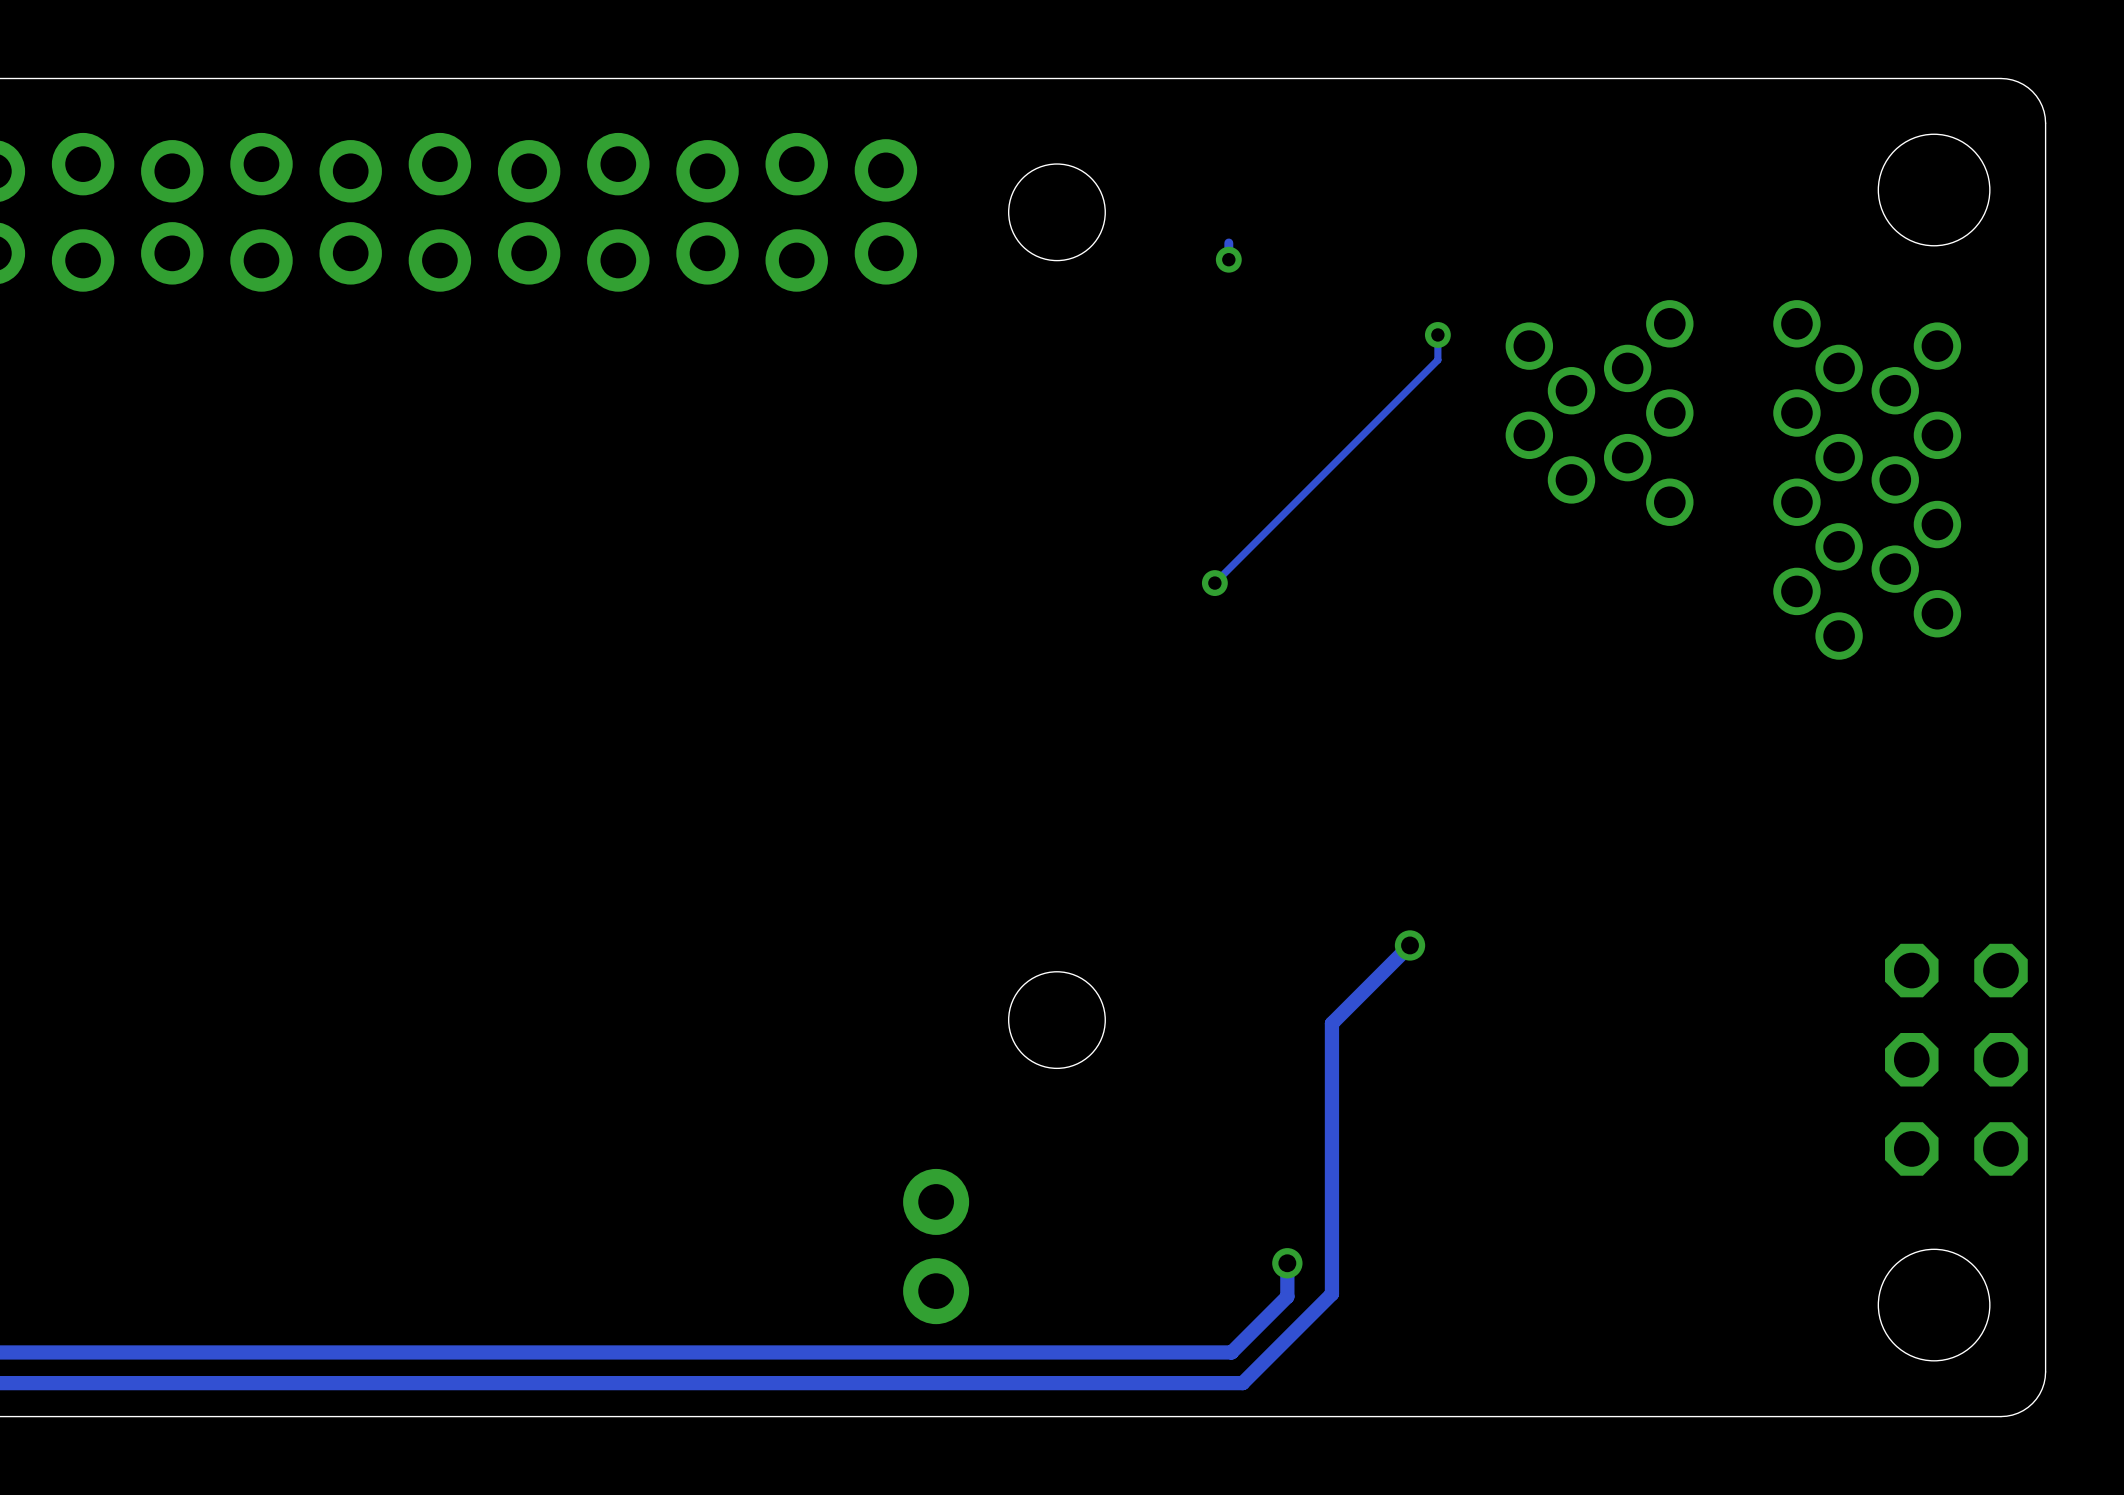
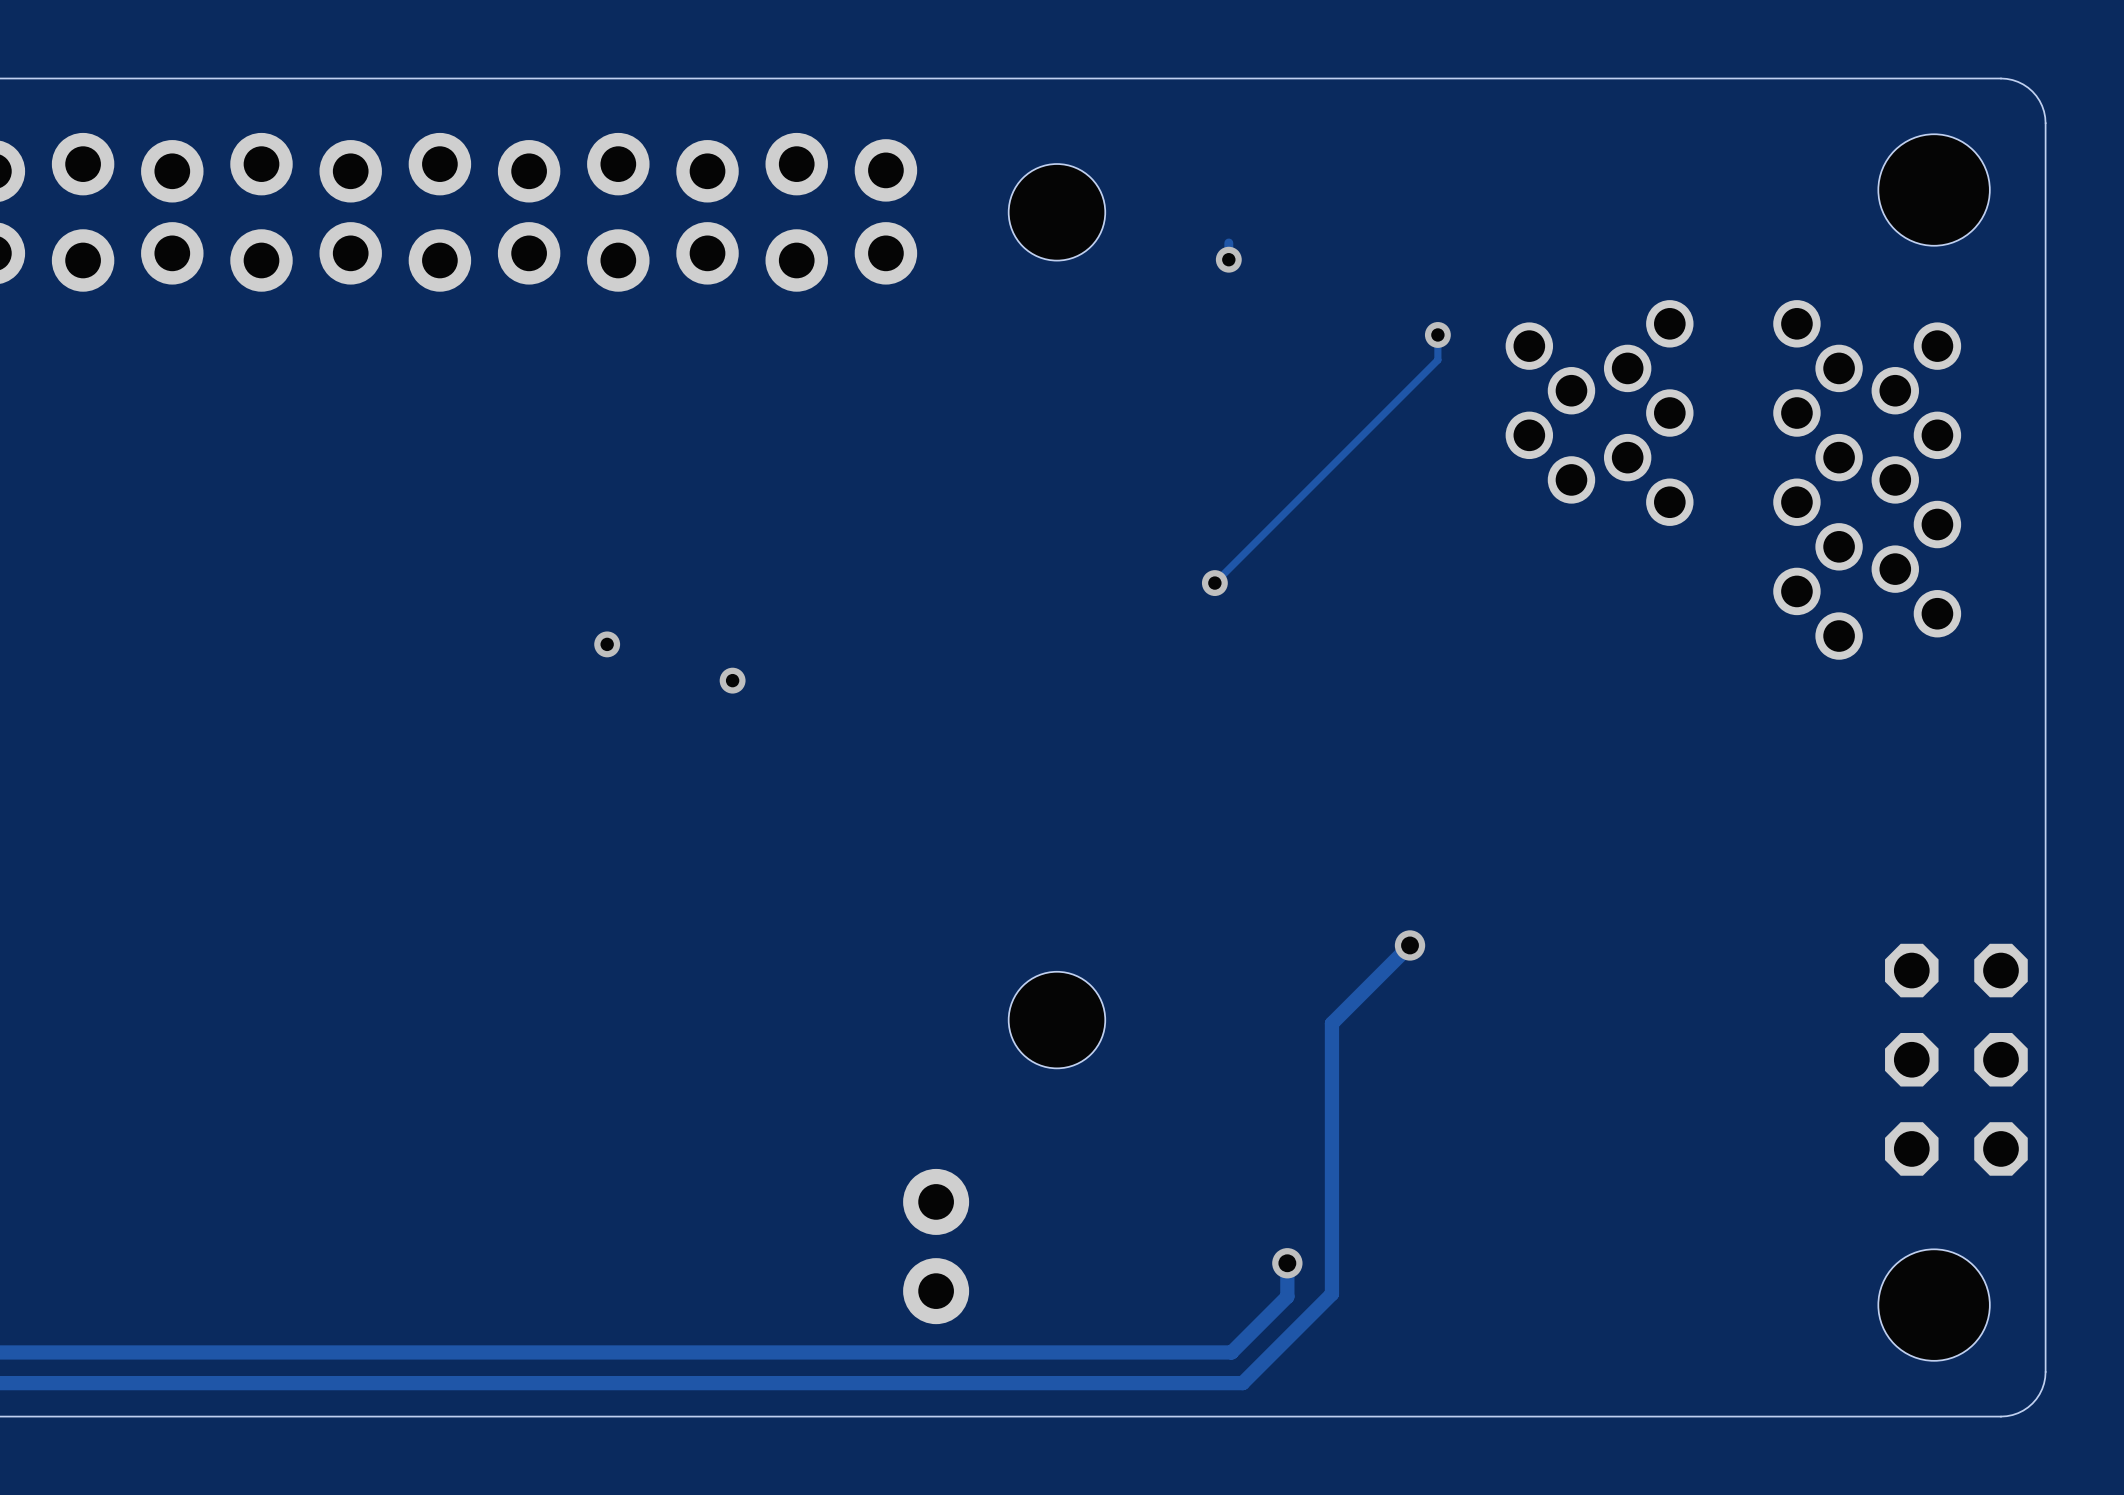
via: none -> (607, 644)
via: none -> (732, 680)

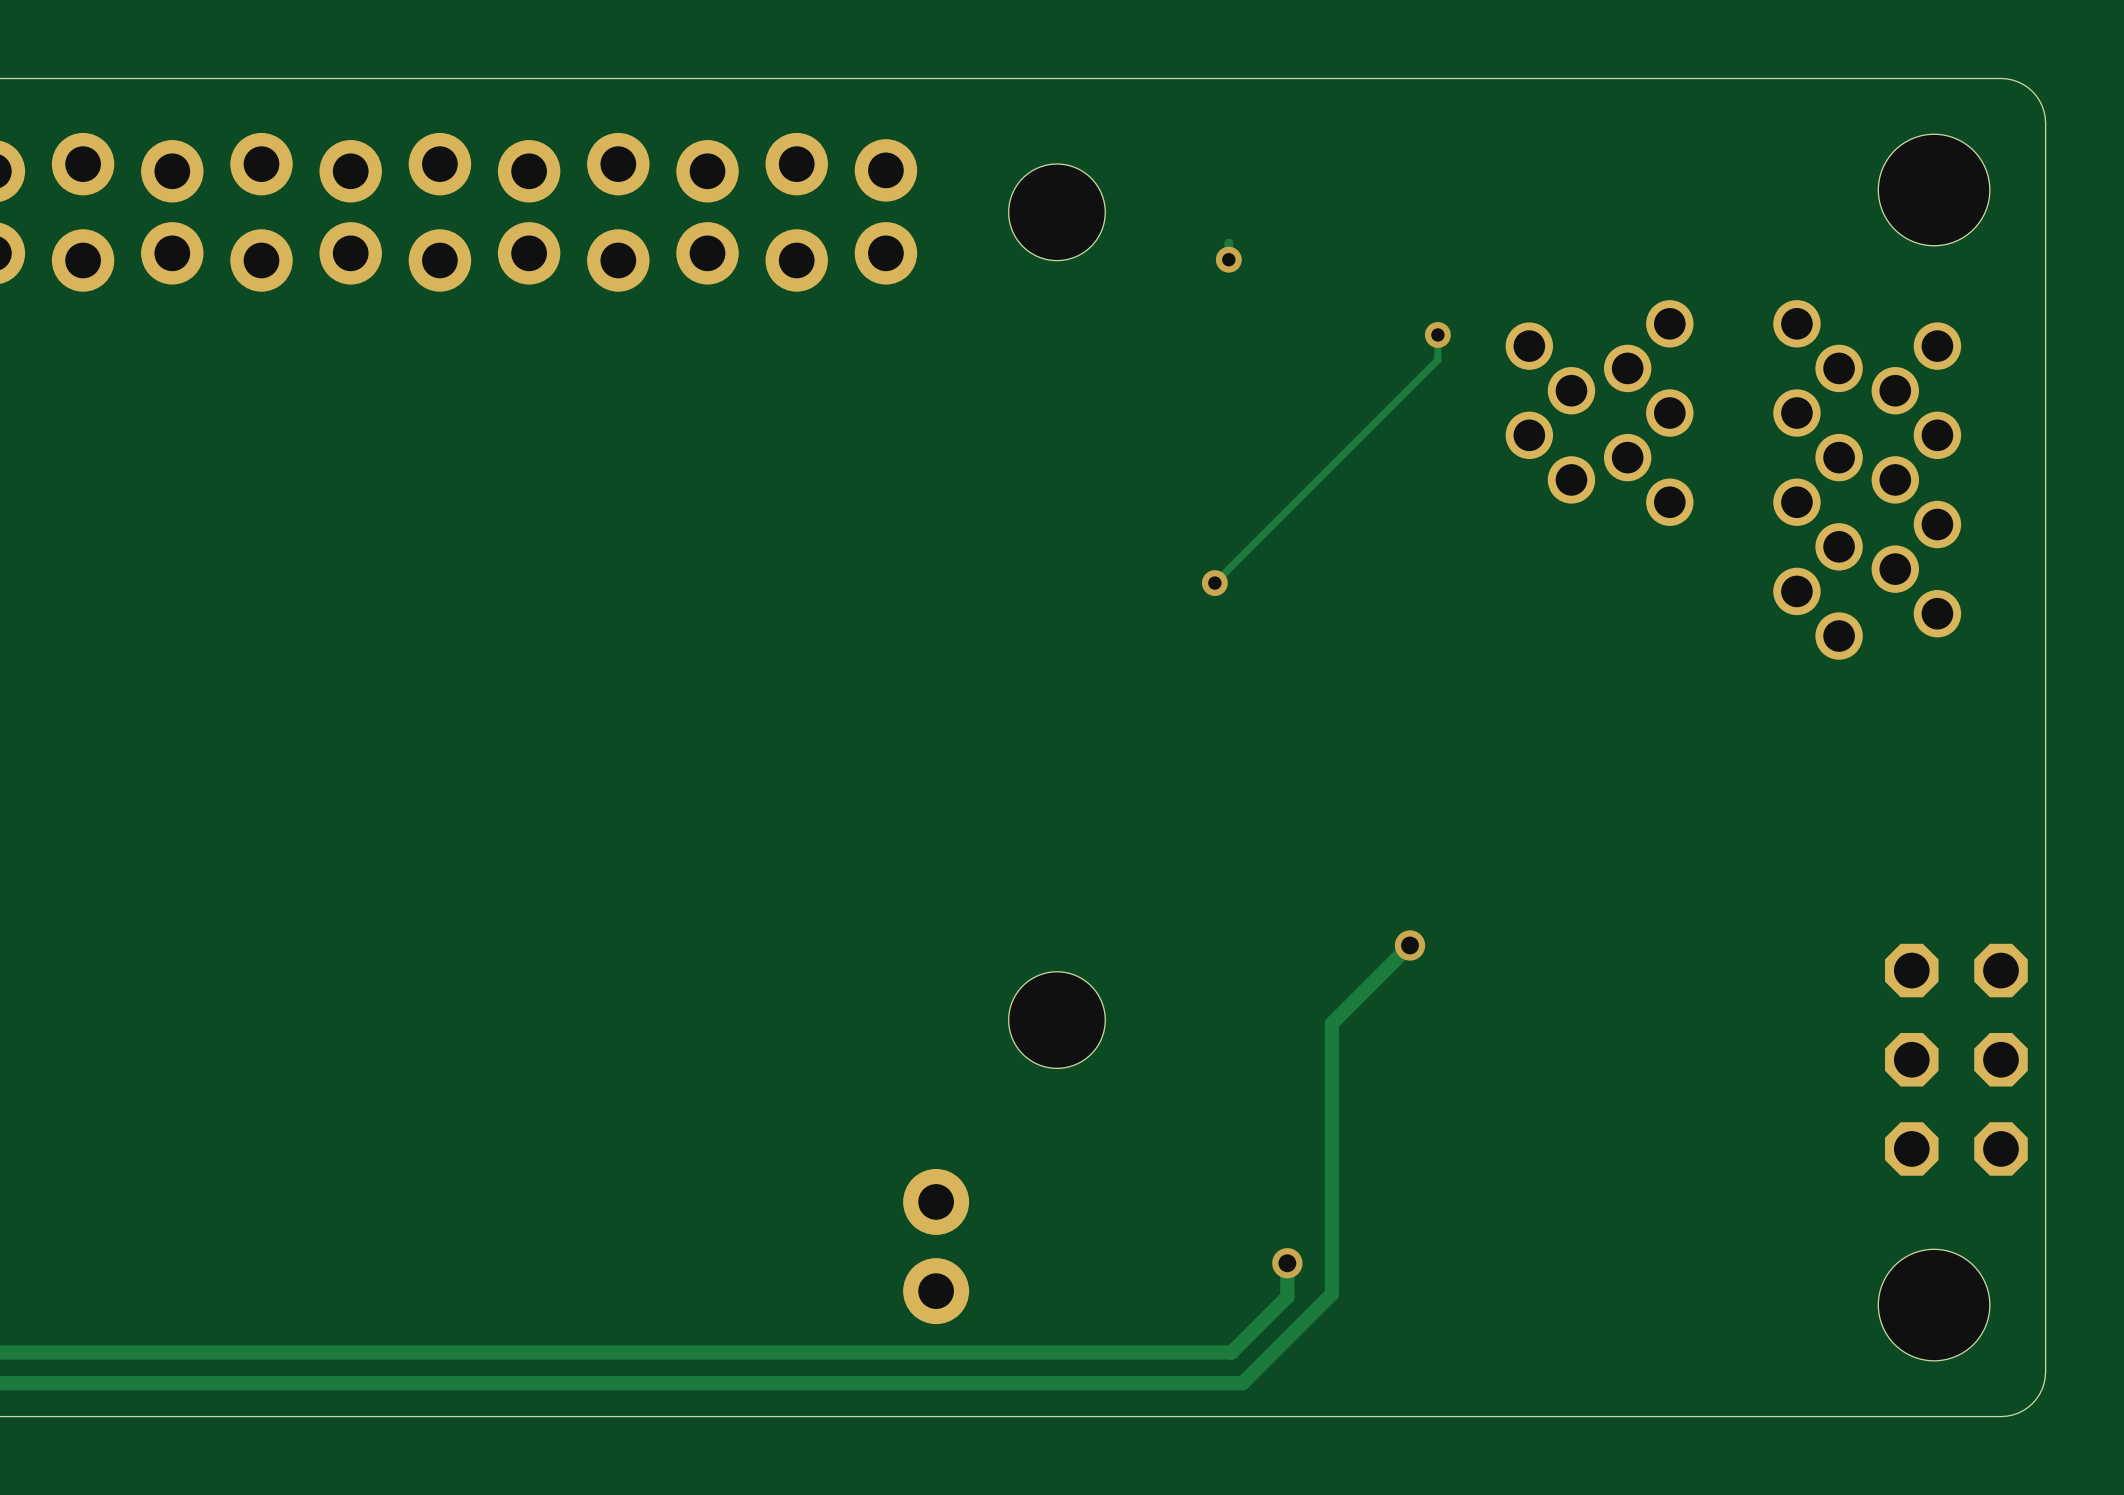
via: (607, 644) -> none
via: (732, 680) -> none

